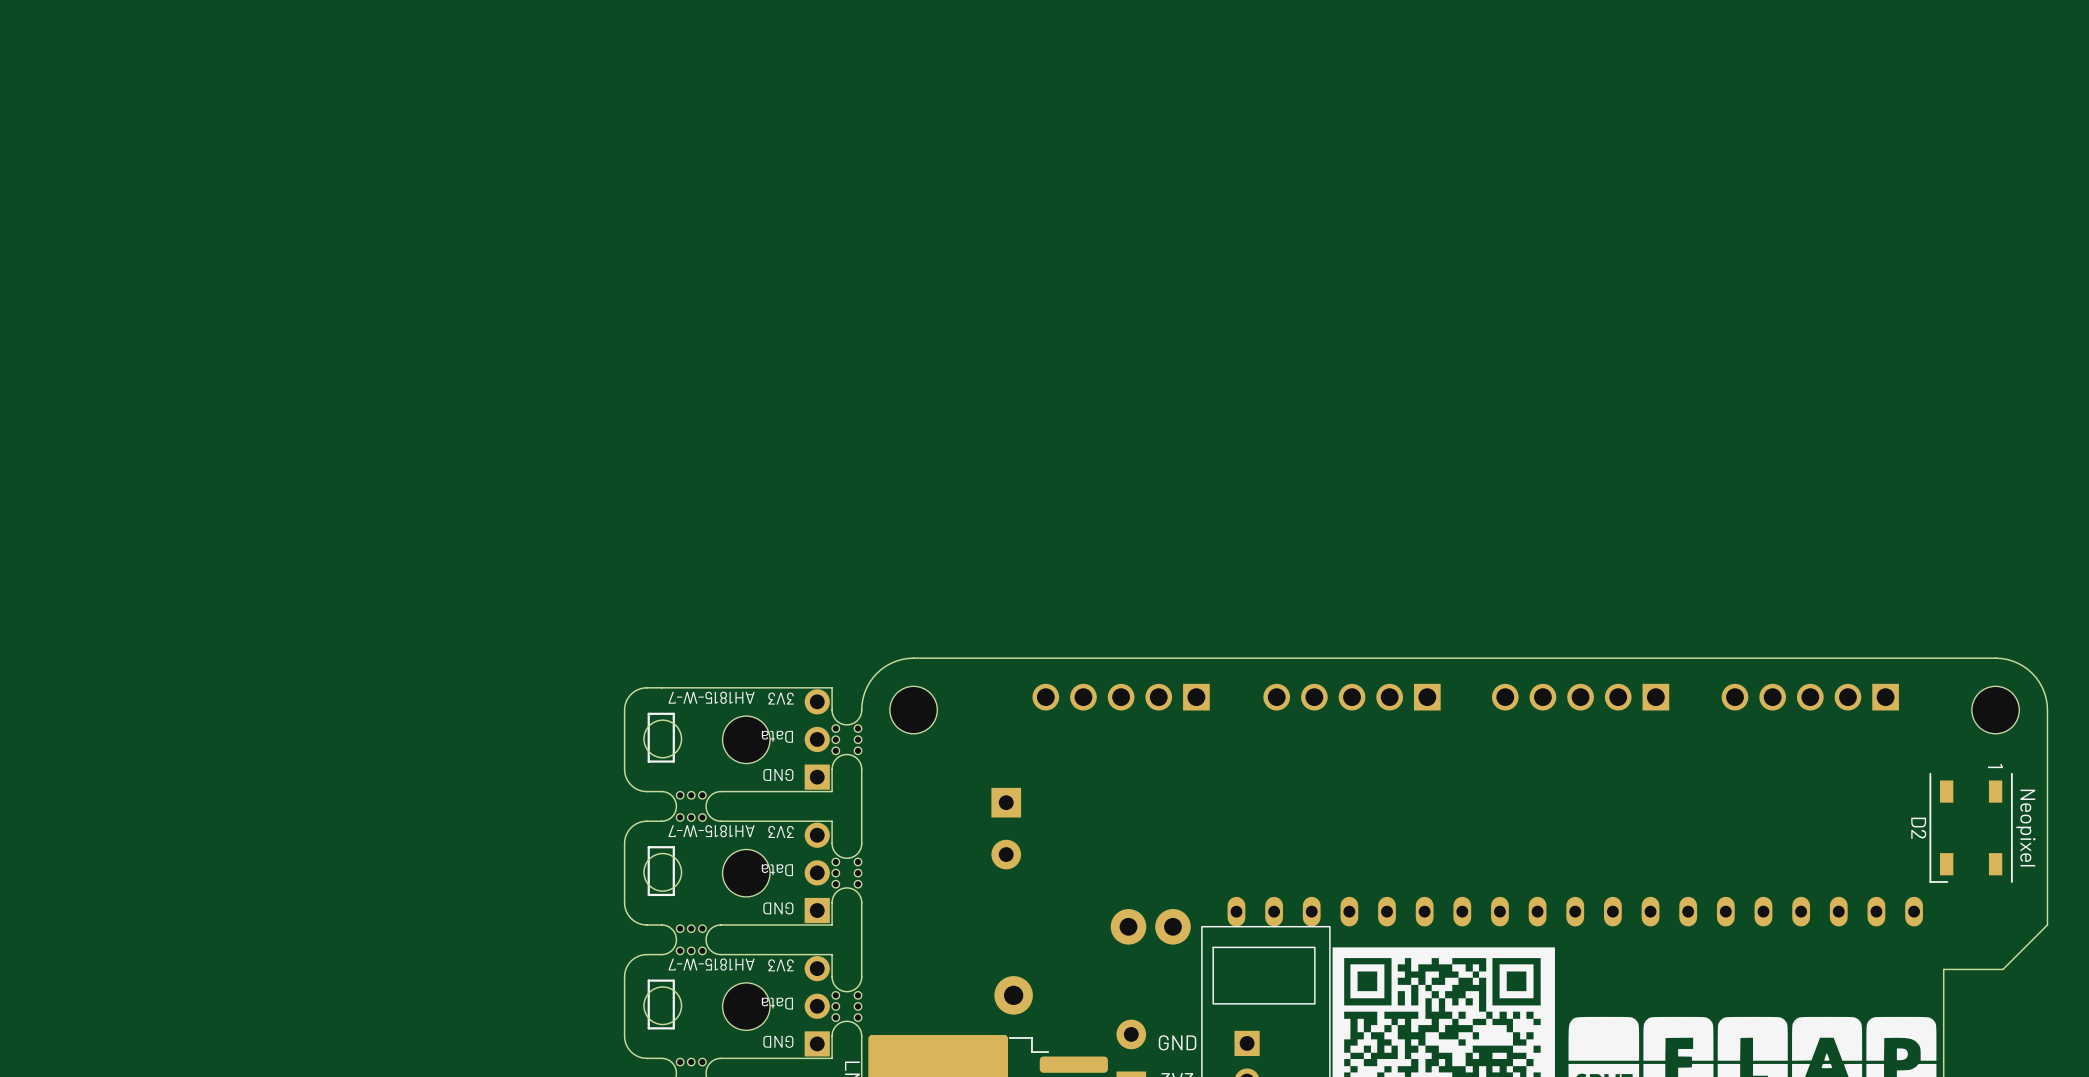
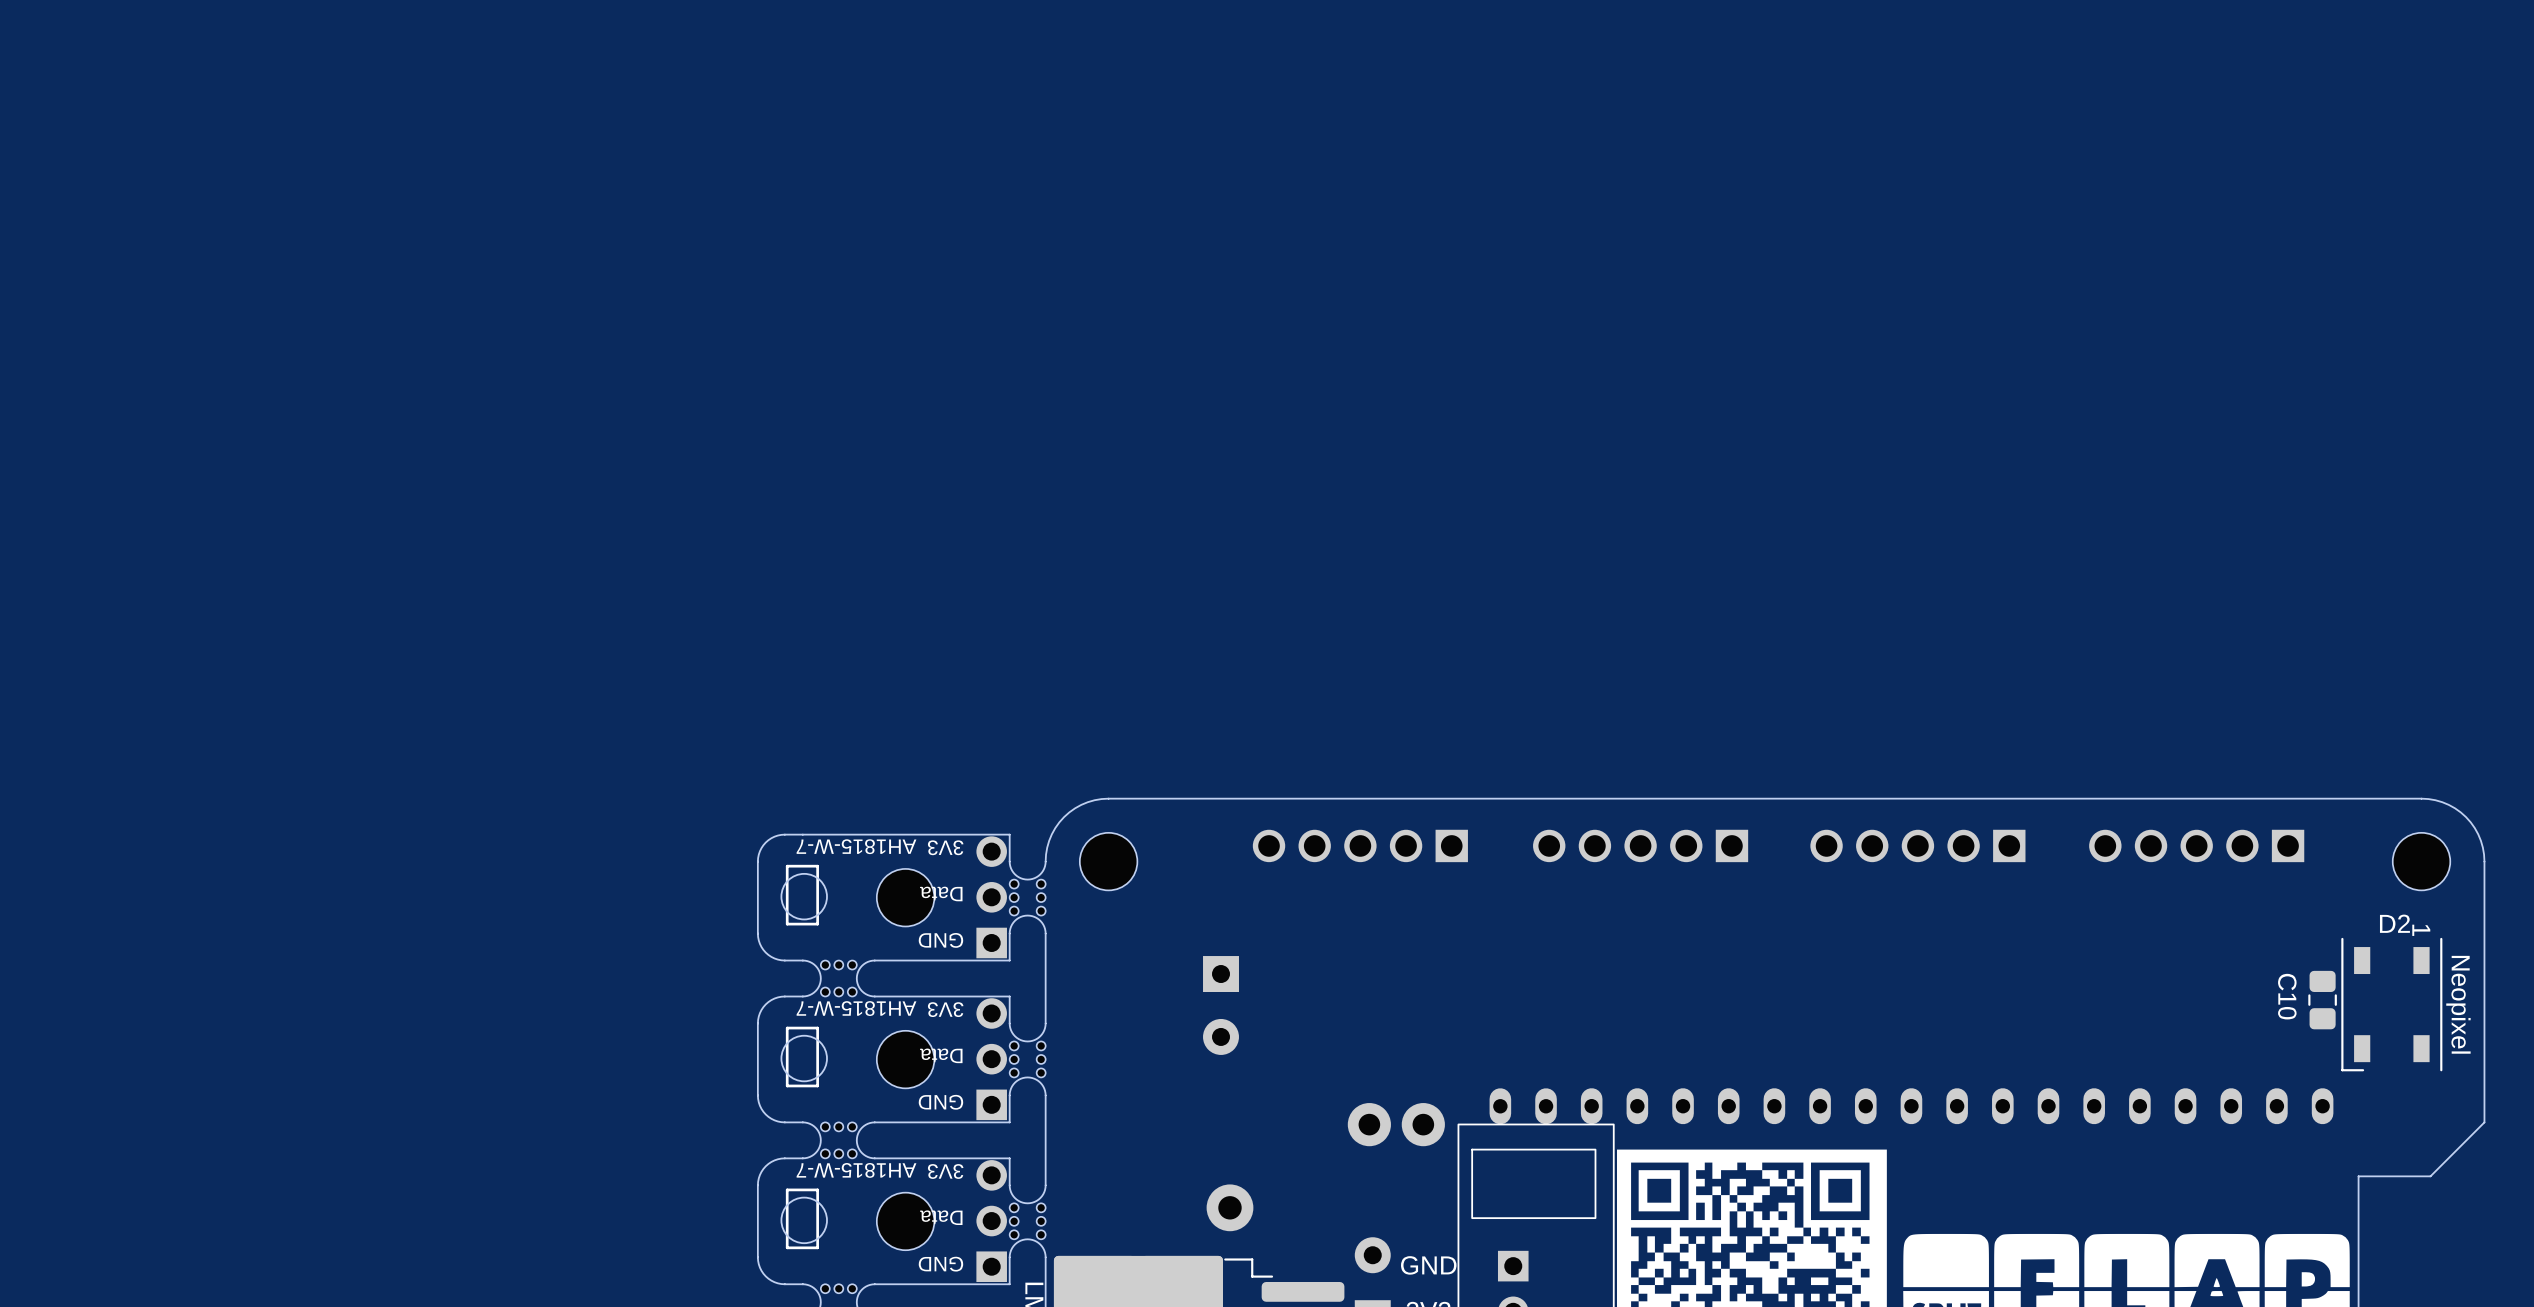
C10: none -> (2322, 1000)
D2 name rotation: 0° (1918, 828) -> 90° counterclockwise (2394, 923)
D2 name position: D2 (1918, 828) -> D2 (2394, 923)

